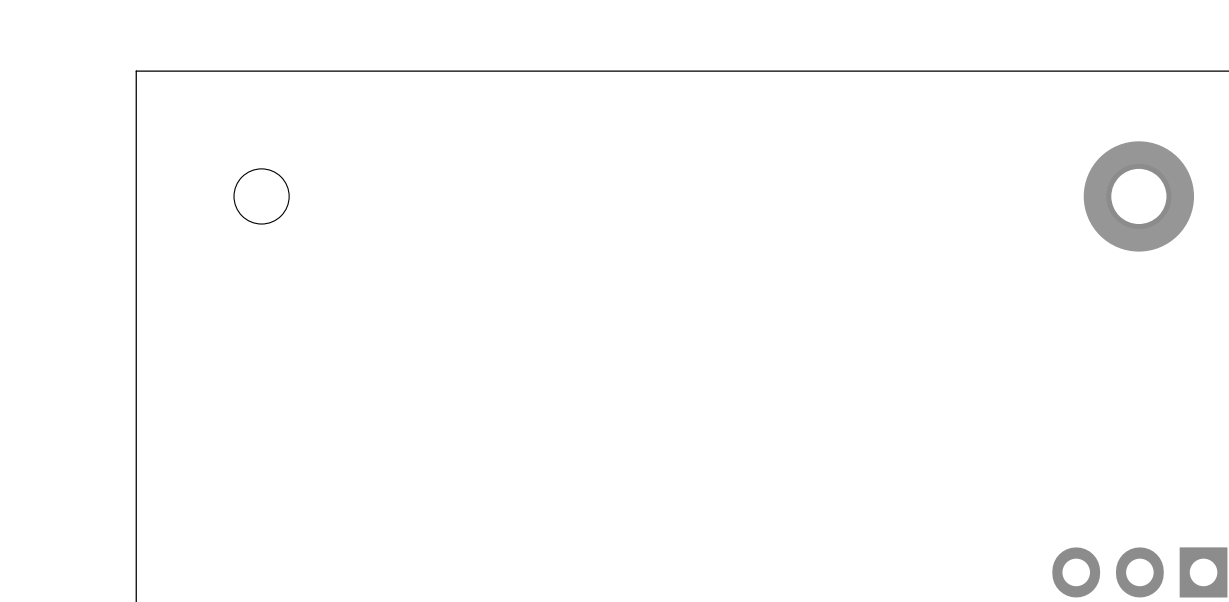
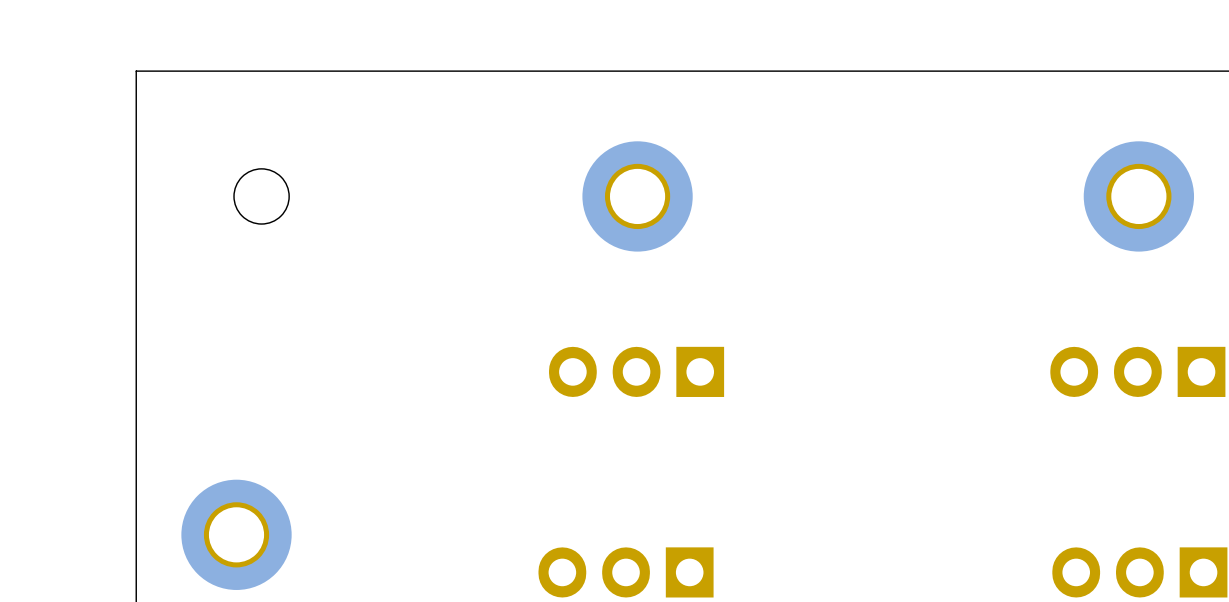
part: none -> (637, 196)
part: none -> (636, 371)
part: none -> (1137, 371)
part: none -> (236, 534)
part: none -> (626, 572)

